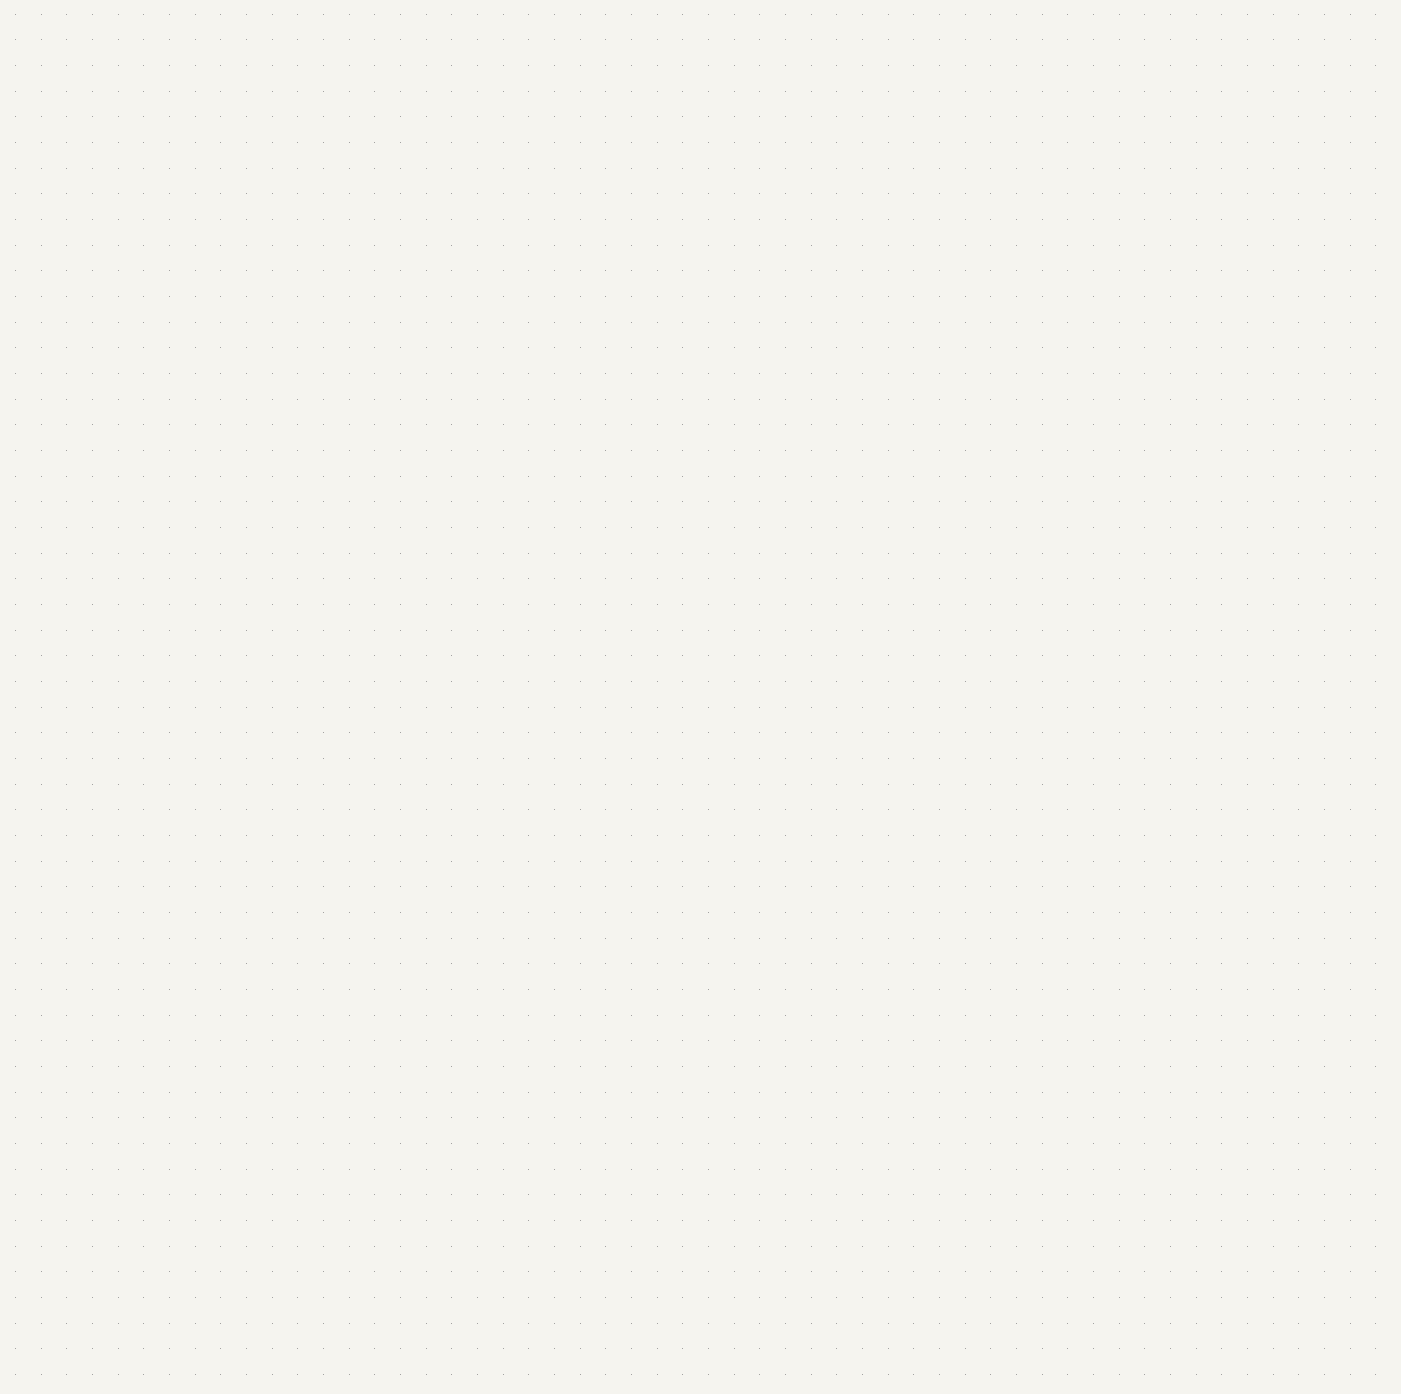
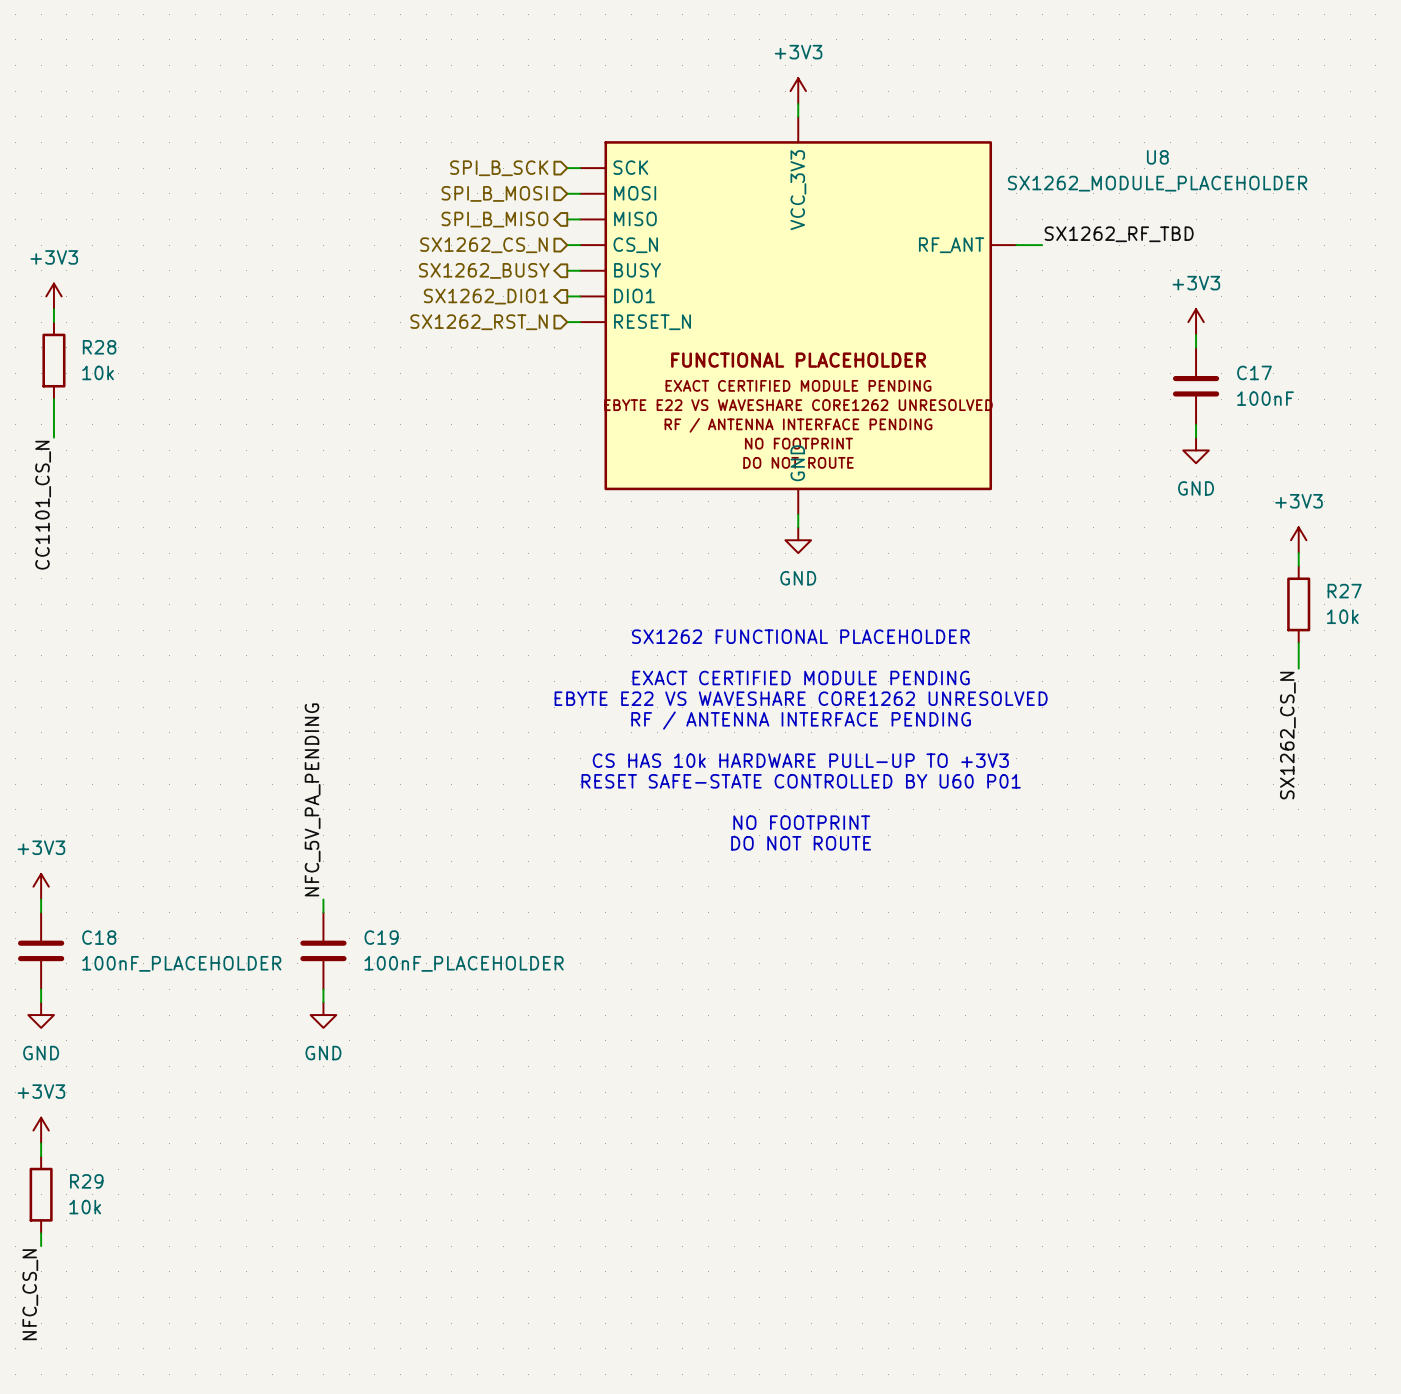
power symbol: none -> +3V3 (798, 91)
wire: none -> (798, 103) (798, 116)
hierarchical label: none -> SPI_B_SCK (499, 168)
wire: none -> (567, 168) (580, 168)
hierarchical label: none -> SPI_B_MOSI (494, 193)
wire: none -> (567, 193) (580, 193)
hierarchical label: none -> SPI_B_MISO (494, 219)
wire: none -> (567, 219) (580, 219)
label: none -> SX1262_RF_TBD (1119, 234)
hierarchical label: none -> SX1262_CS_N (483, 245)
wire: none -> (567, 245) (580, 245)
wire: none -> (1016, 245) (1042, 245)
hierarchical label: none -> SX1262_BUSY (484, 270)
wire: none -> (567, 270) (580, 270)
power symbol: none -> +3V3 (53, 296)
hierarchical label: none -> SX1262_DIO1 (486, 296)
wire: none -> (567, 296) (580, 296)
wire: none -> (53, 309) (53, 322)
U8: none -> SX1262_MODULE_PLACEHOLDER (798, 315)
hierarchical label: none -> SX1262_RST_N (479, 322)
wire: none -> (567, 322) (580, 322)
power symbol: none -> +3V3 (1196, 322)
wire: none -> (1196, 334) (1196, 347)
R28: none -> 10k (53, 360)
C17: none -> 100nF (1196, 386)
wire: none -> (53, 399) (53, 437)
wire: none -> (1196, 424) (1196, 437)
power symbol: none -> GND (1196, 450)
label: none -> CC1101_CS_N (43, 505)
wire: none -> (798, 514) (798, 527)
power symbol: none -> GND (798, 540)
power symbol: none -> +3V3 (1298, 540)
wire: none -> (1298, 553) (1298, 565)
R27: none -> 10k (1298, 604)
text: none -> SX1262 FUNCTIONAL PLACEHOLDER (800, 636)
wire: none -> (1298, 642) (1298, 668)
text: none -> EXACT CERTIFIED MODULE PENDING (801, 678)
text: none -> EBYTE E22 VS WAVESHARE CORE1262 UNRESOLVED (801, 698)
text: none -> RF / ANTENNA INTERFACE PENDING (801, 720)
label: none -> SX1262_CS_N (1287, 735)
text: none -> CS HAS 10k HARDWARE PULL-UP TO +3V3 (800, 760)
text: none -> RESET SAFE-STATE CONTROLLED BY U60 P01 (801, 781)
label: none -> NFC_5V_PA_PENDING (312, 799)
text: none -> NO FOOTPRINT (801, 822)
text: none -> DO NOT ROUTE (801, 843)
power symbol: none -> +3V3 (41, 886)
wire: none -> (41, 899) (41, 912)
wire: none -> (323, 899) (323, 912)
C18: none -> 100nF_PLACEHOLDER (41, 950)
C19: none -> 100nF_PLACEHOLDER (323, 950)
wire: none -> (41, 989) (41, 1002)
wire: none -> (323, 989) (323, 1002)
power symbol: none -> GND (41, 1015)
power symbol: none -> GND (323, 1015)
power symbol: none -> +3V3 (41, 1130)
wire: none -> (41, 1143) (41, 1156)
R29: none -> 10k (41, 1194)
wire: none -> (41, 1233) (41, 1246)
label: none -> NFC_CS_N (30, 1294)

